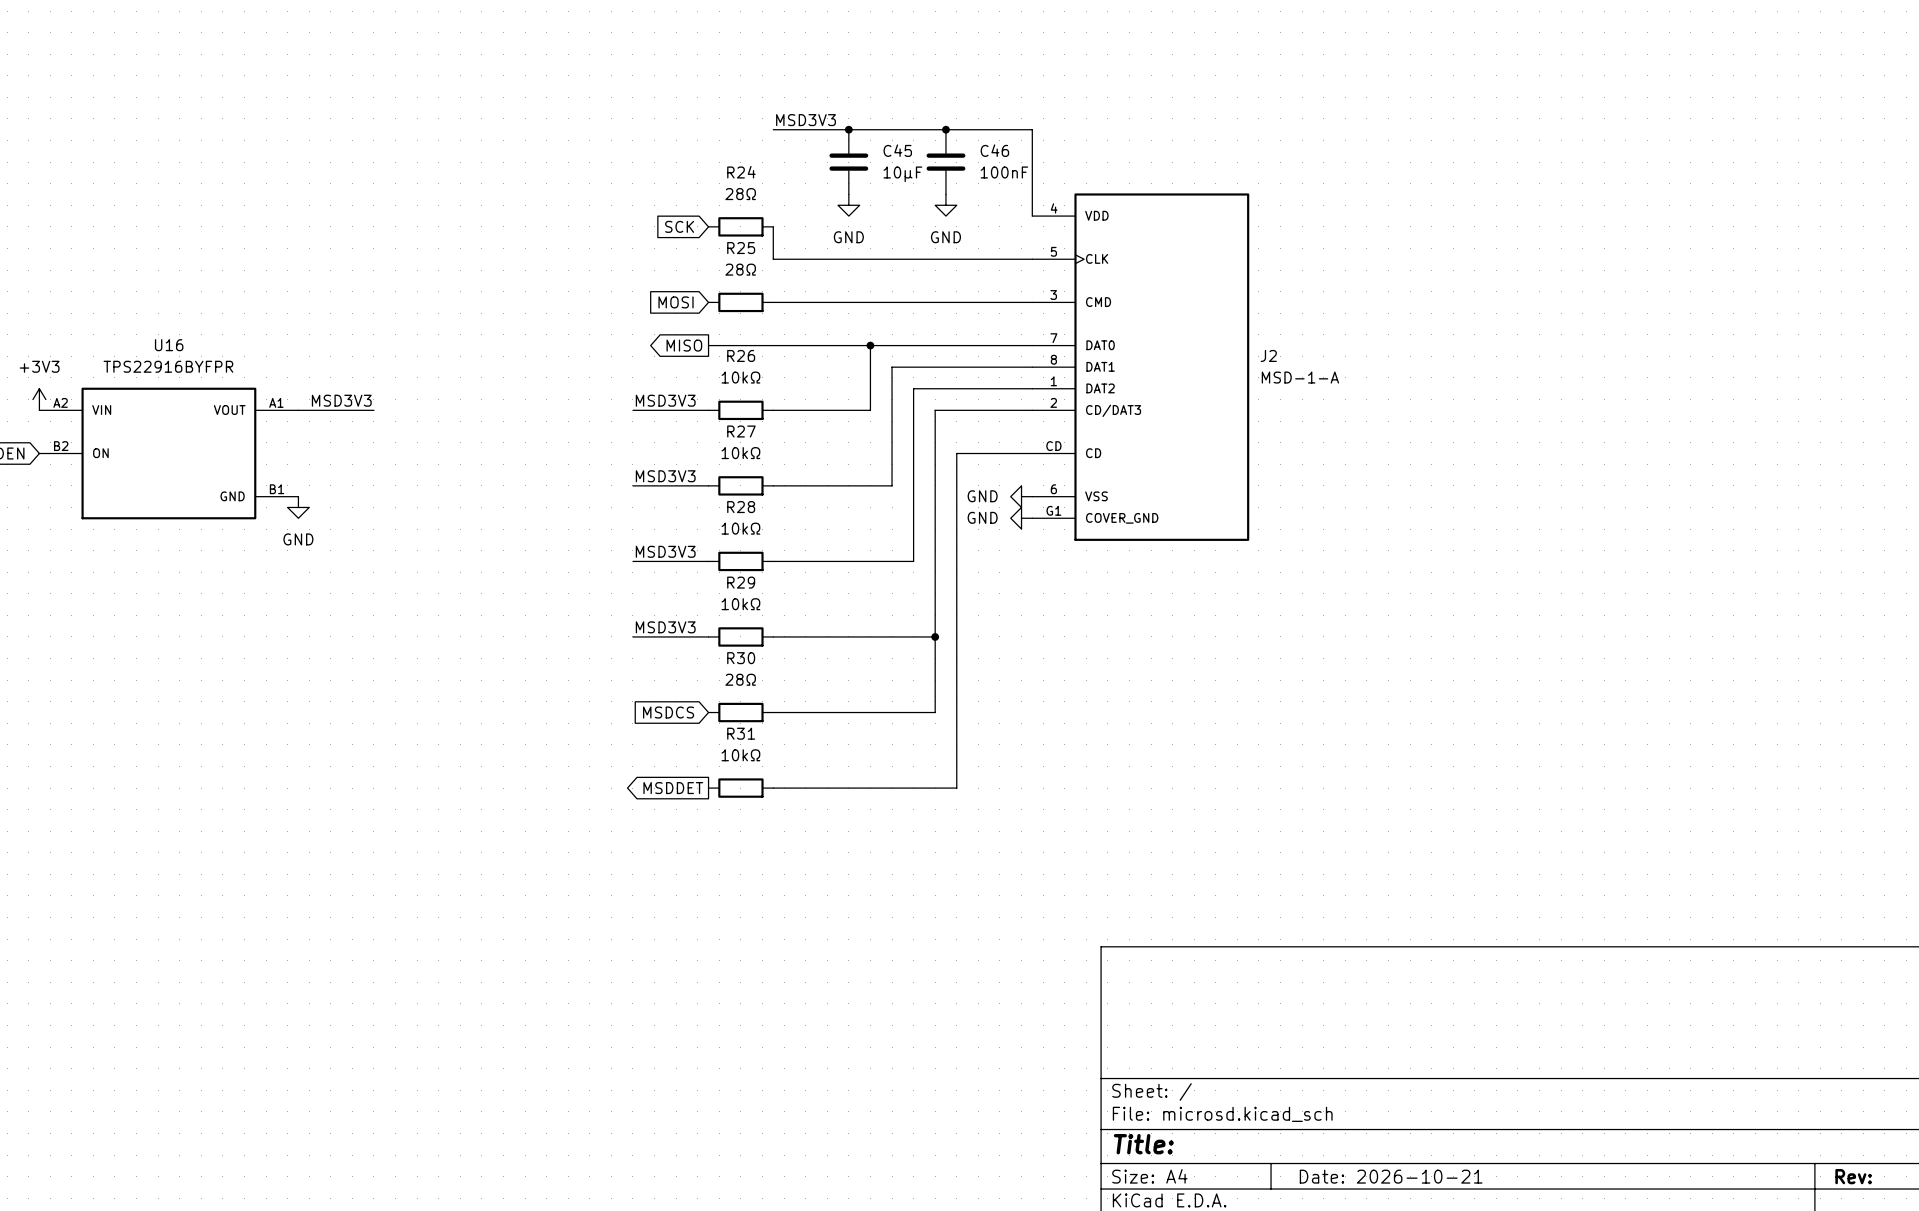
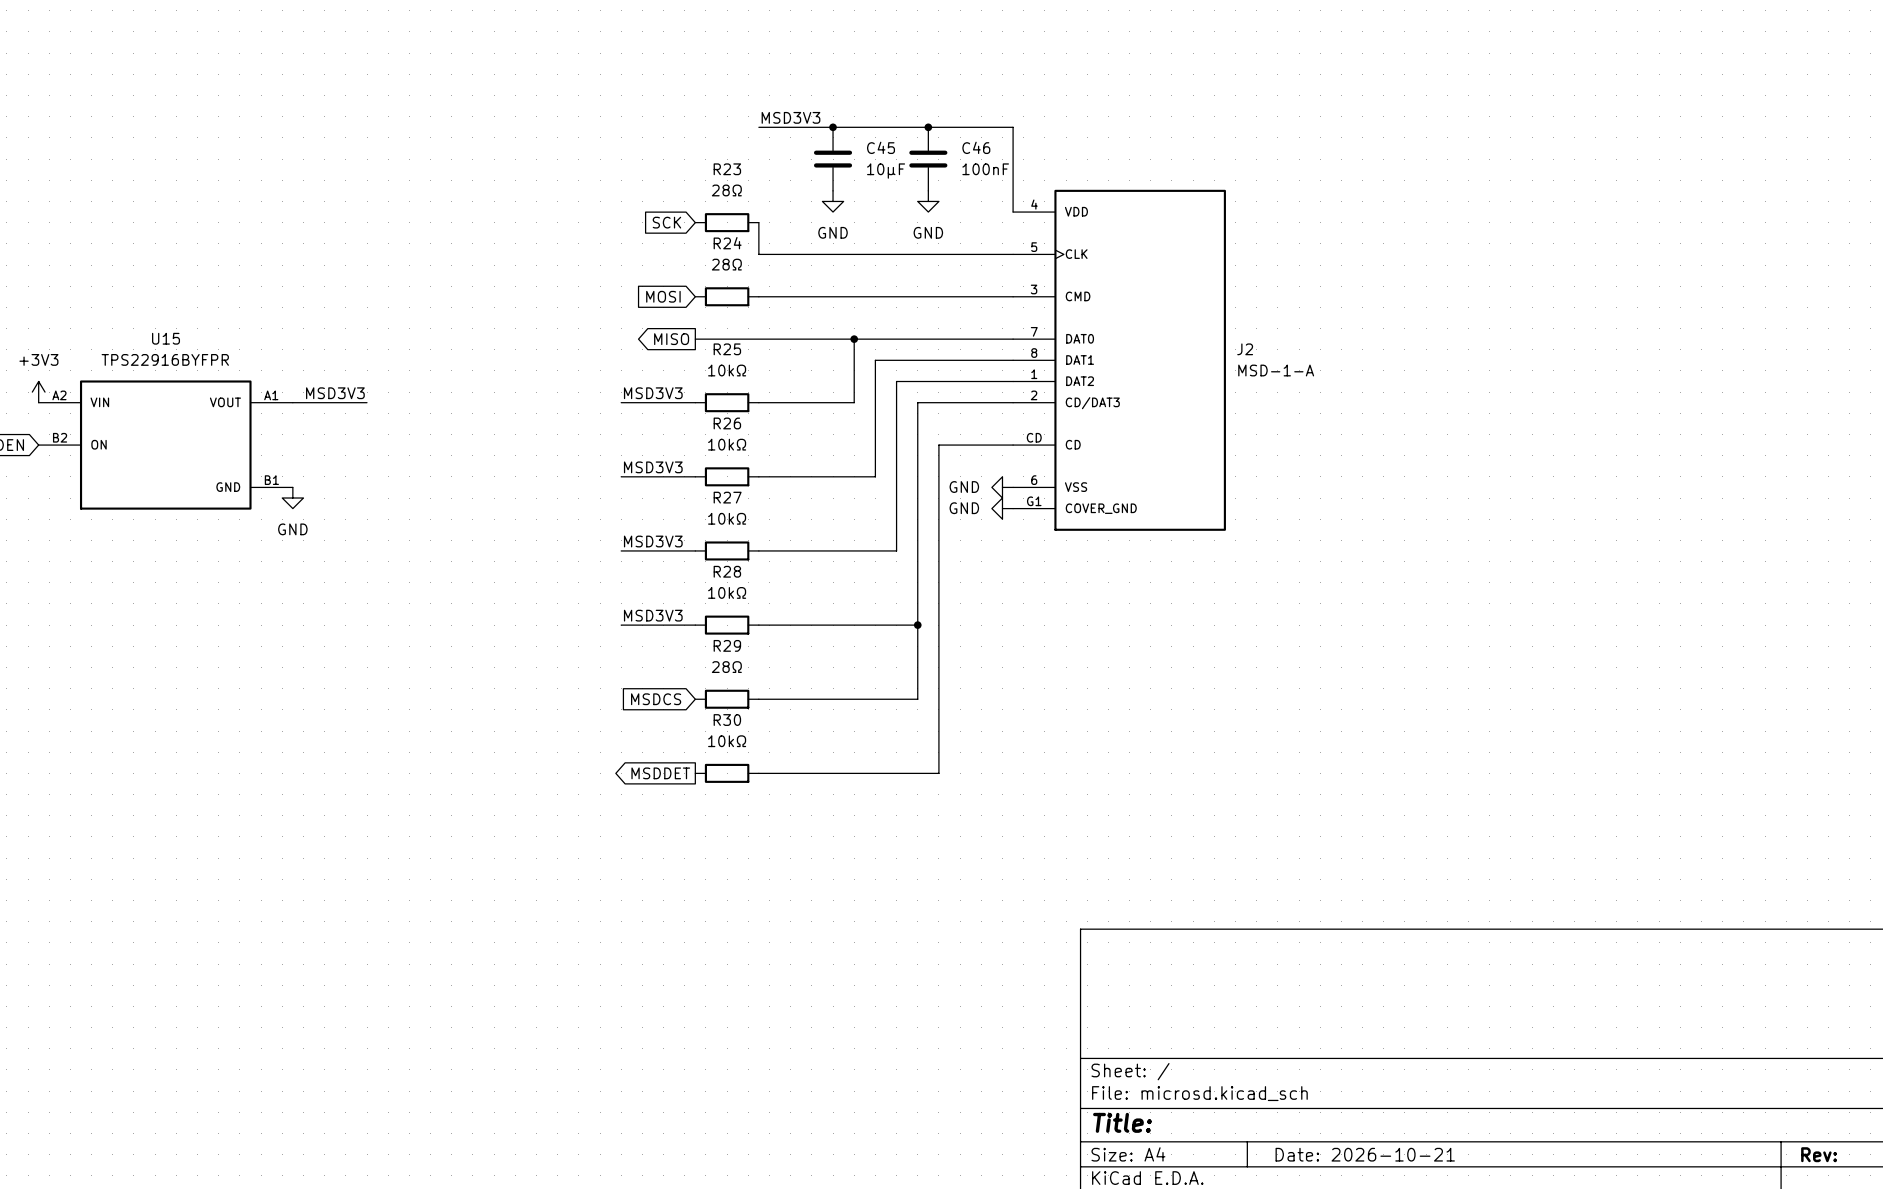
R24 name: R24 (741, 172) -> R23 (727, 169)
R25 name: R25 (741, 248) -> R24 (727, 243)
U16 name: U16 (169, 345) -> U15 (166, 338)
R26 name: R26 (741, 355) -> R25 (727, 349)
R27 name: R27 (741, 431) -> R26 (727, 423)
R28 name: R28 (741, 507) -> R27 (727, 497)
R29 name: R29 (741, 582) -> R28 (727, 571)
R30 name: R30 (741, 658) -> R29 (727, 645)
R31 name: R31 (741, 733) -> R30 (727, 720)

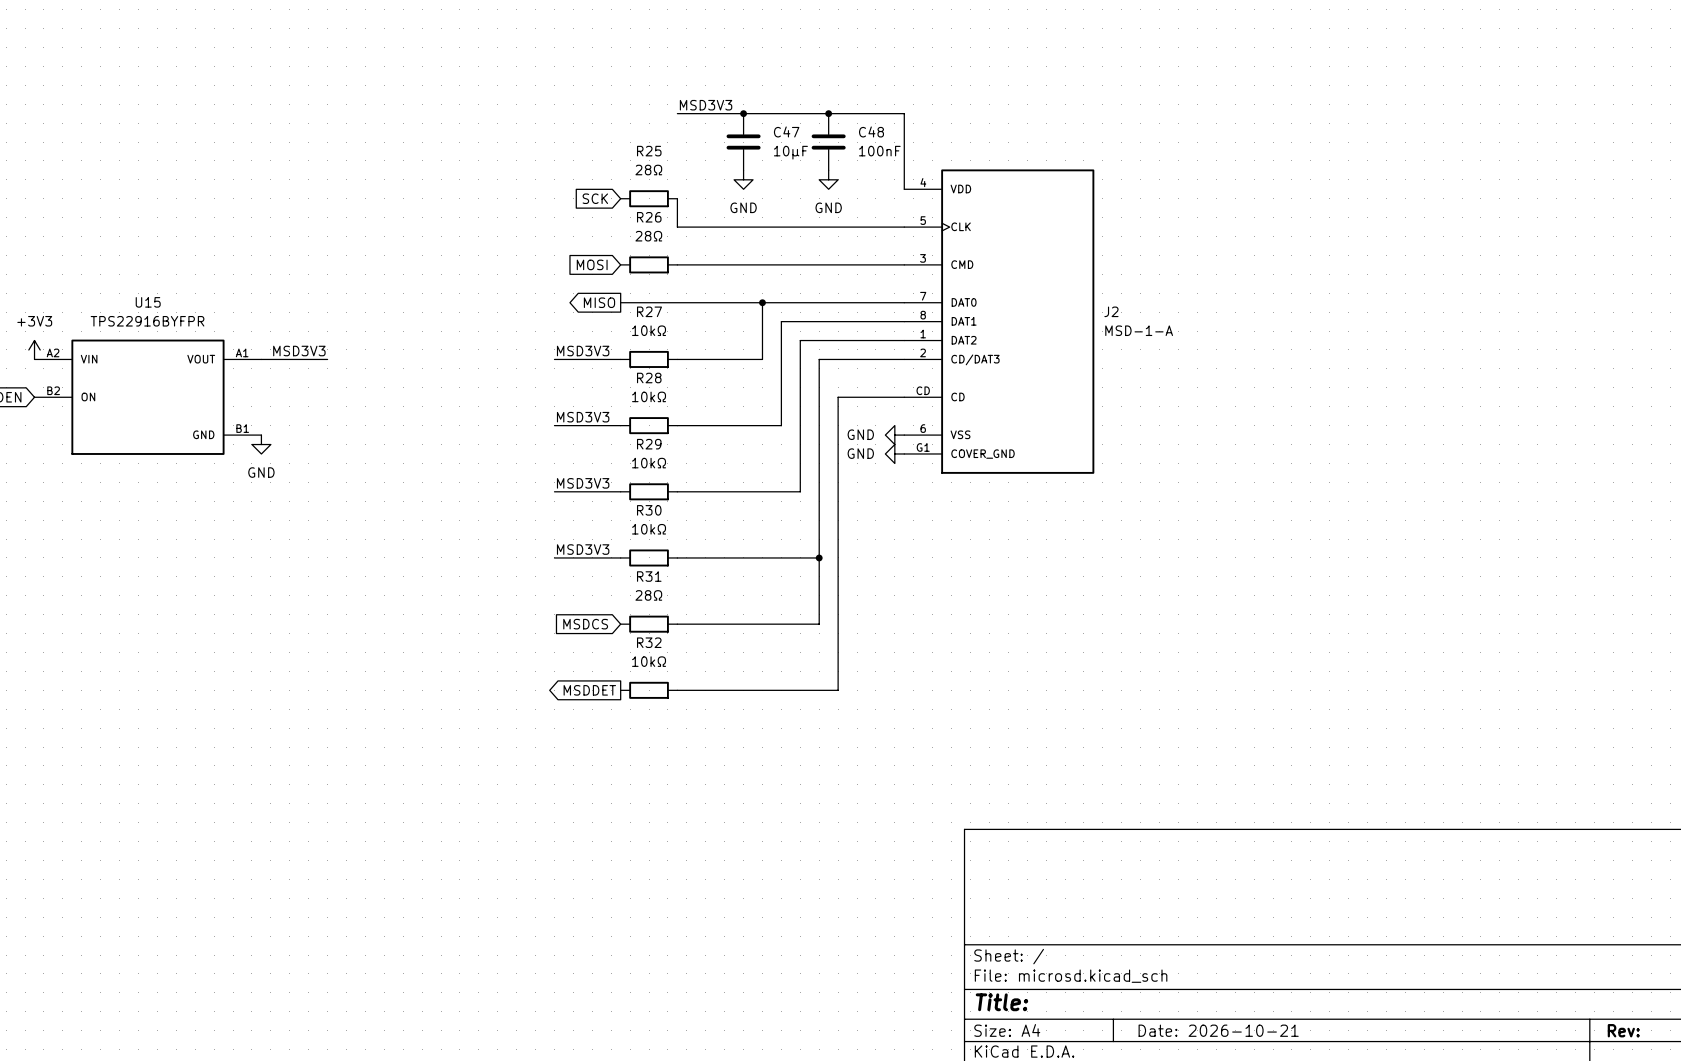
C45 name: C45 (881, 147) -> C47 (786, 131)
C46 name: C46 (976, 147) -> C48 (871, 131)
R23 name: R23 (727, 169) -> R25 (649, 151)
R24 name: R24 (727, 243) -> R26 (649, 217)
R25 name: R25 (727, 349) -> R27 (649, 311)
R26 name: R26 (727, 423) -> R28 (649, 378)
R27 name: R27 (727, 497) -> R29 (649, 444)
R28 name: R28 (727, 571) -> R30 (649, 510)
R29 name: R29 (727, 645) -> R31 (649, 576)
R30 name: R30 (727, 720) -> R32 (649, 642)

